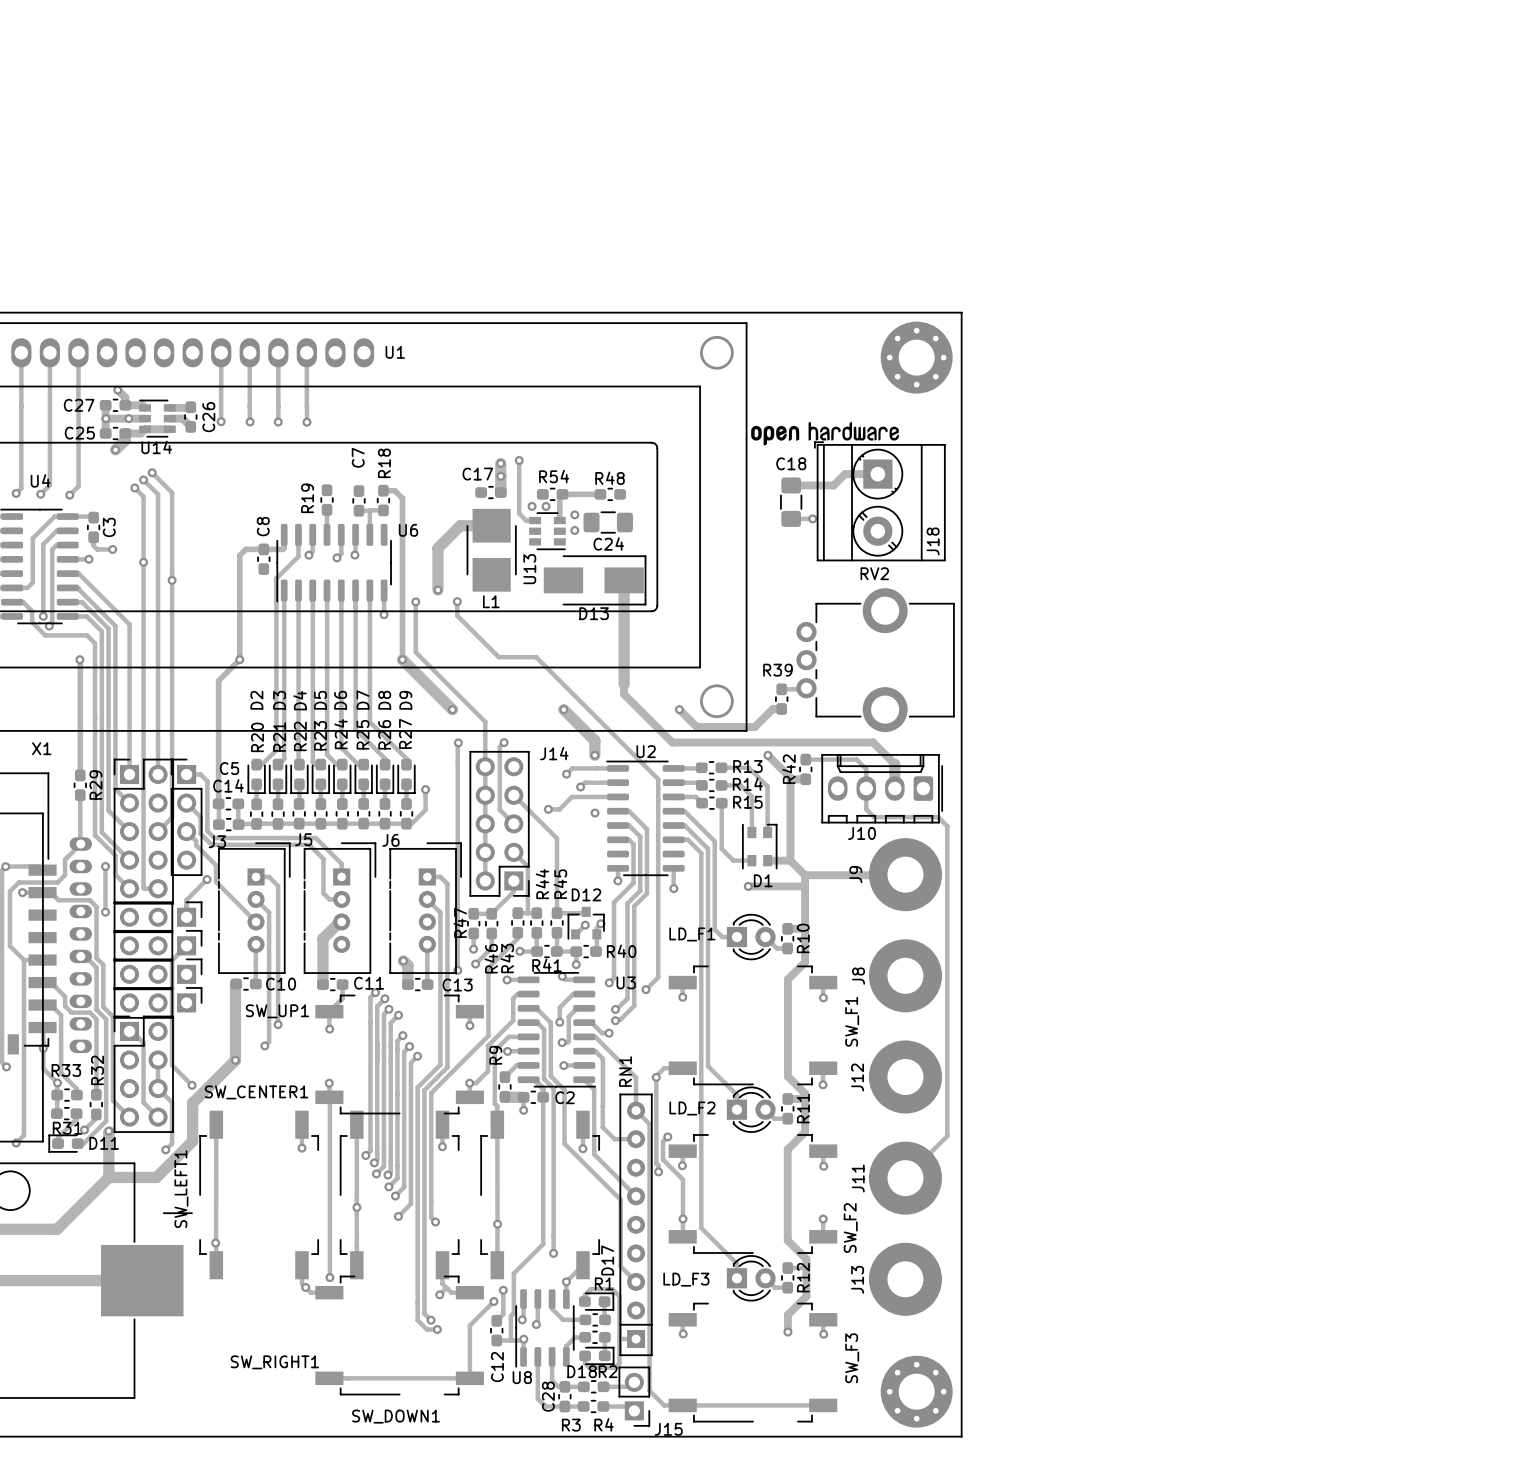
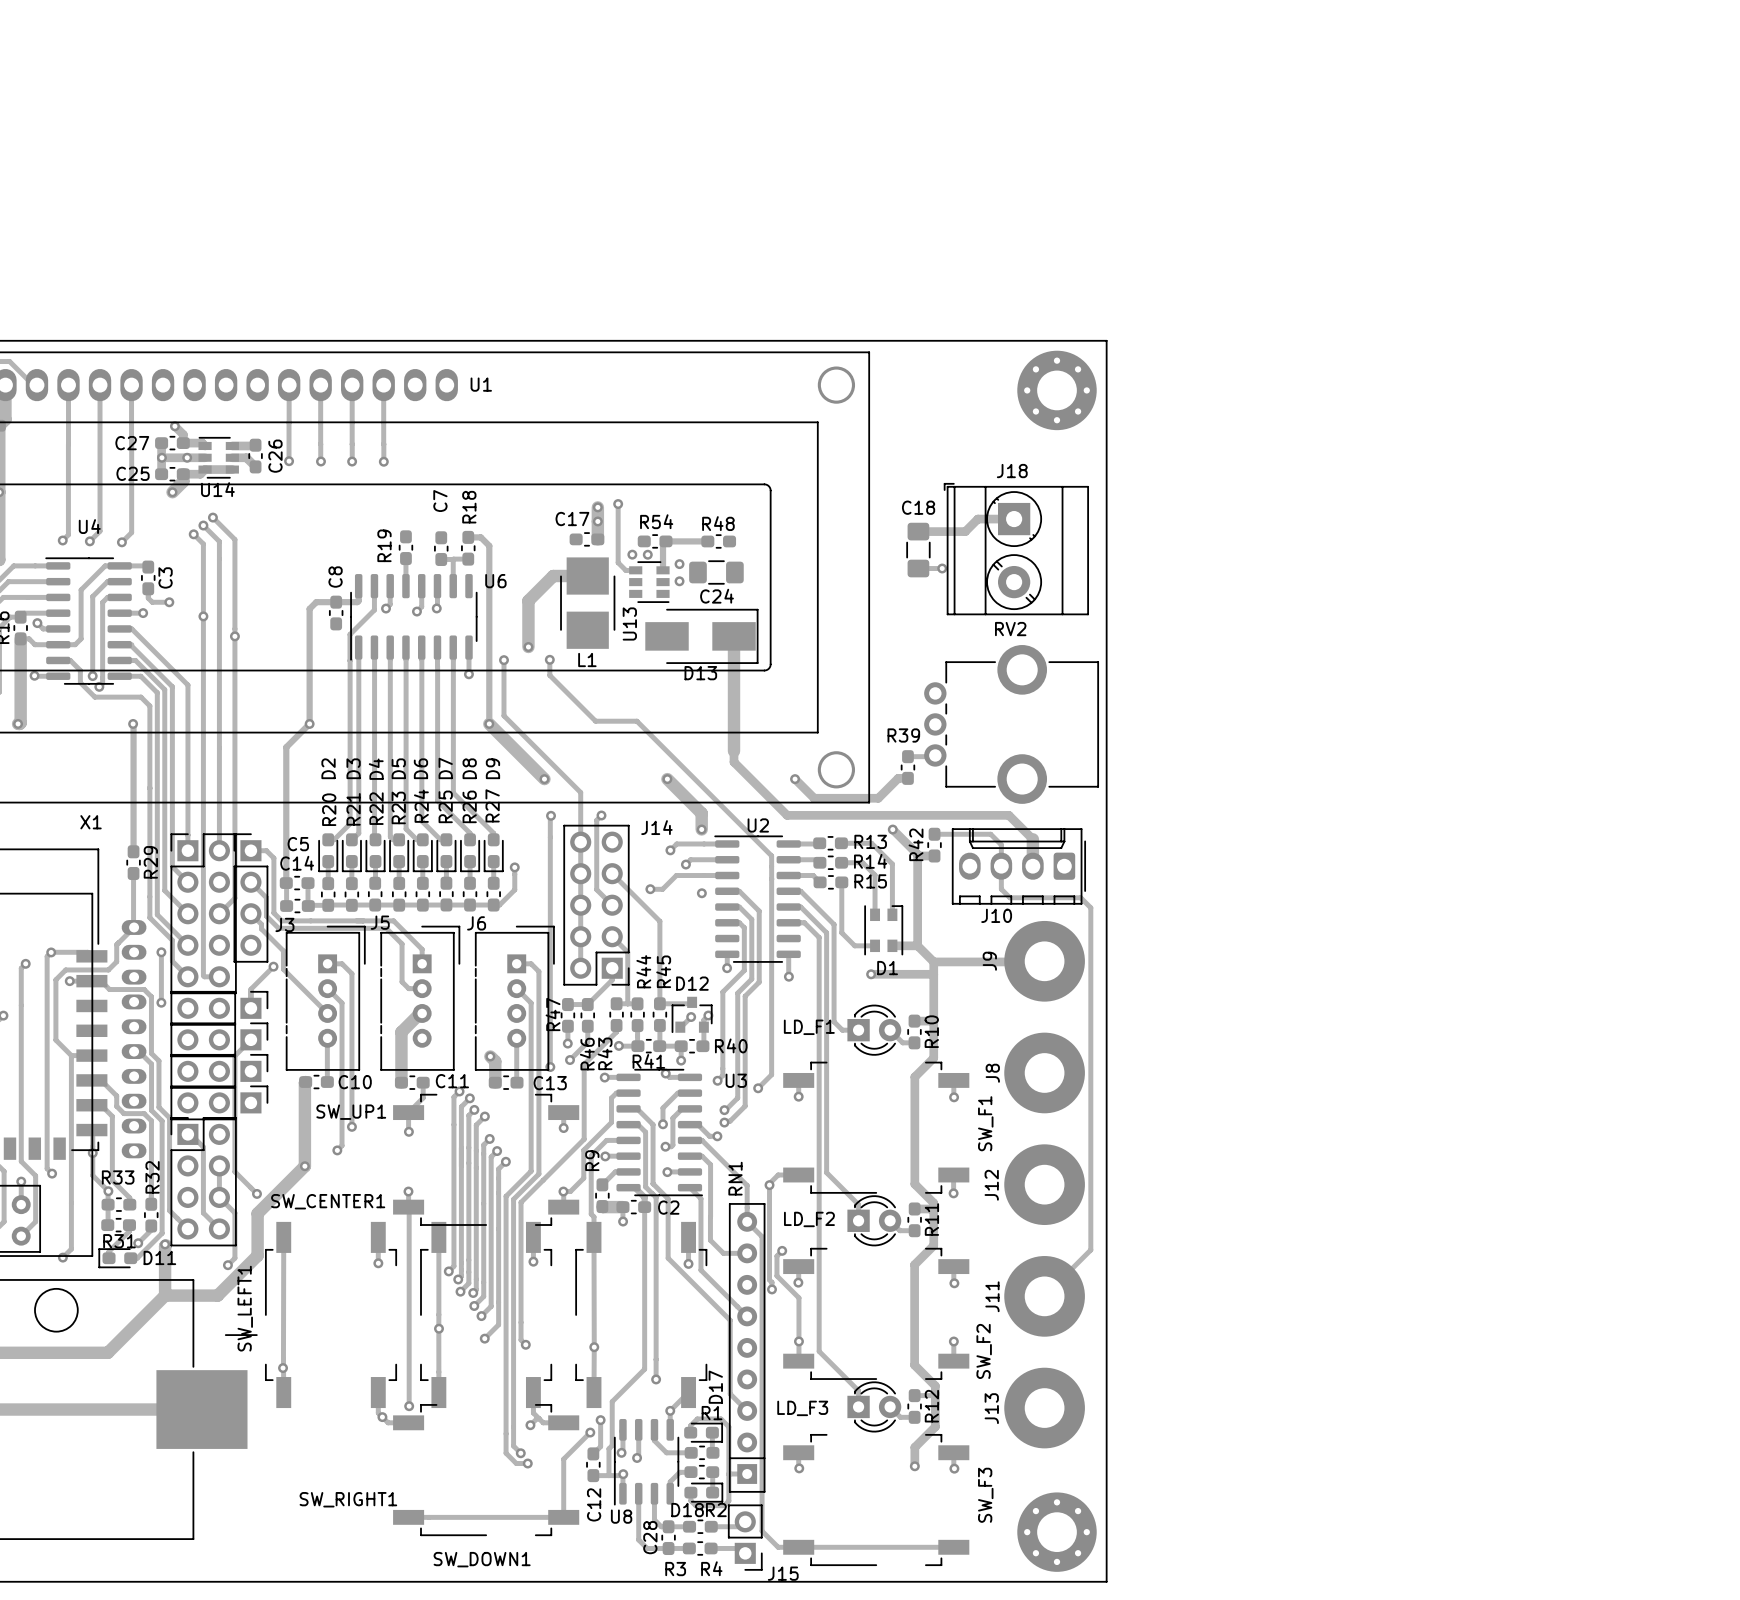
drawing: [751, 421, 899, 446] -> none
J18 name rotation: 0° (933, 541) -> 90° clockwise (1012, 471)
J18 name position: J18 (933, 541) -> J18 (1012, 471)

